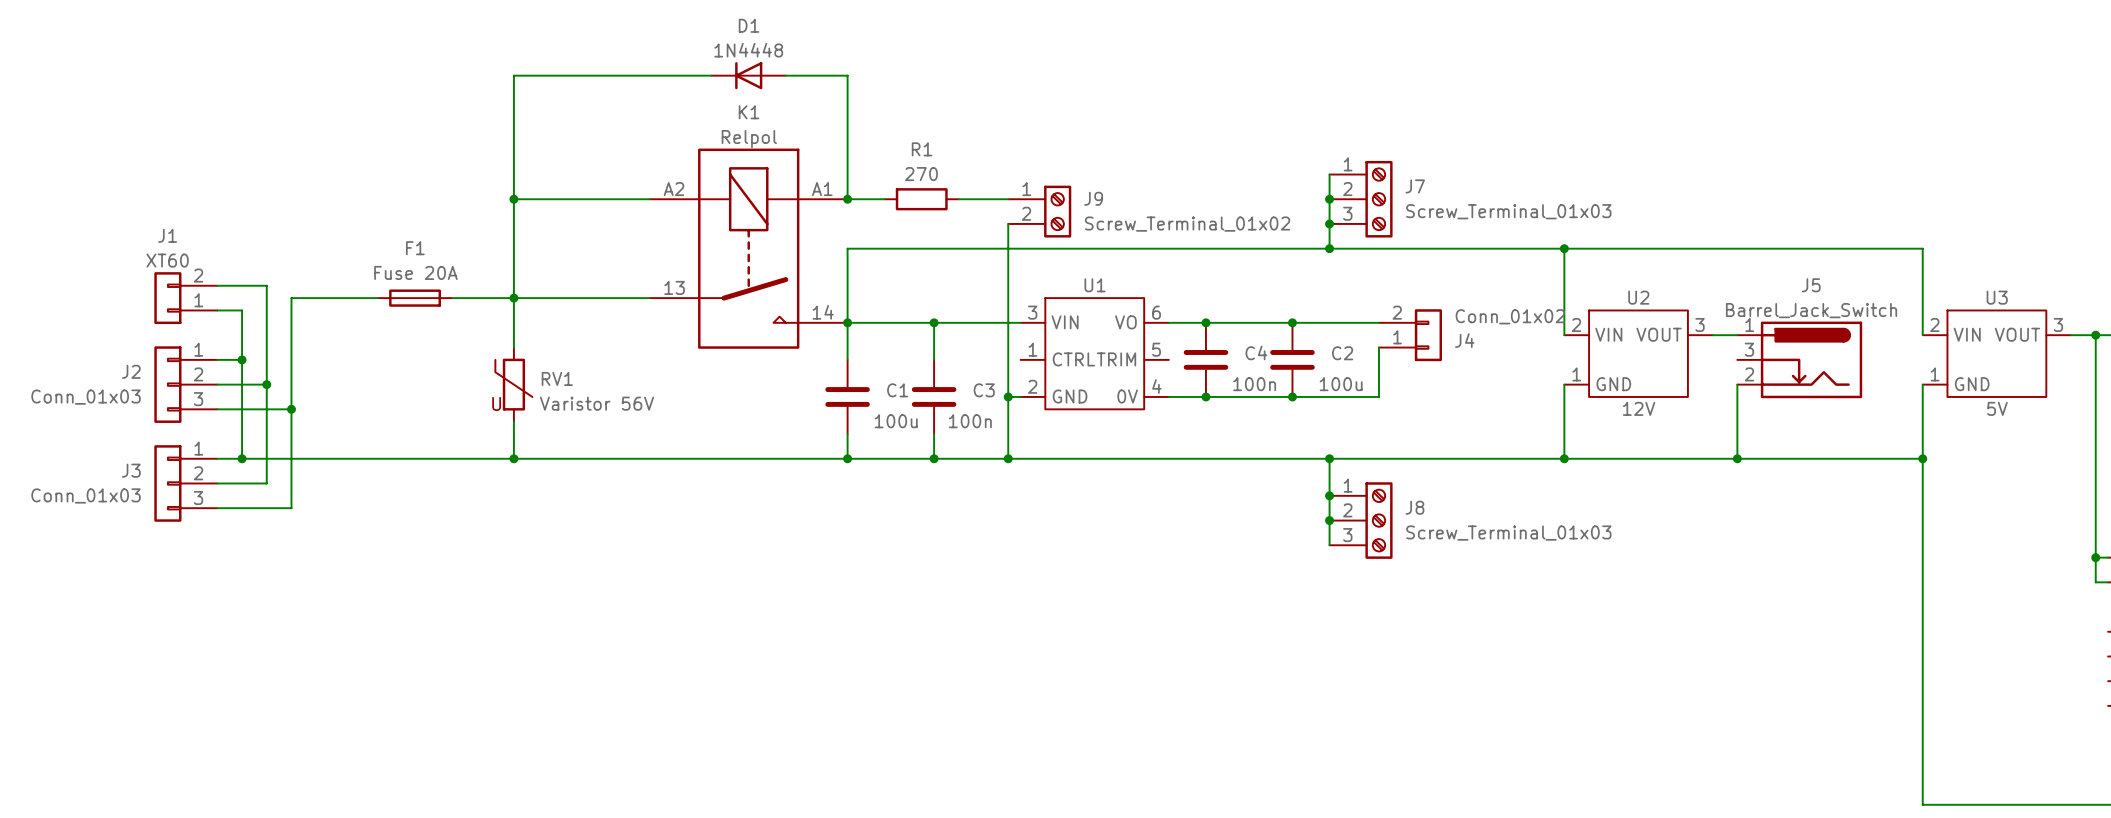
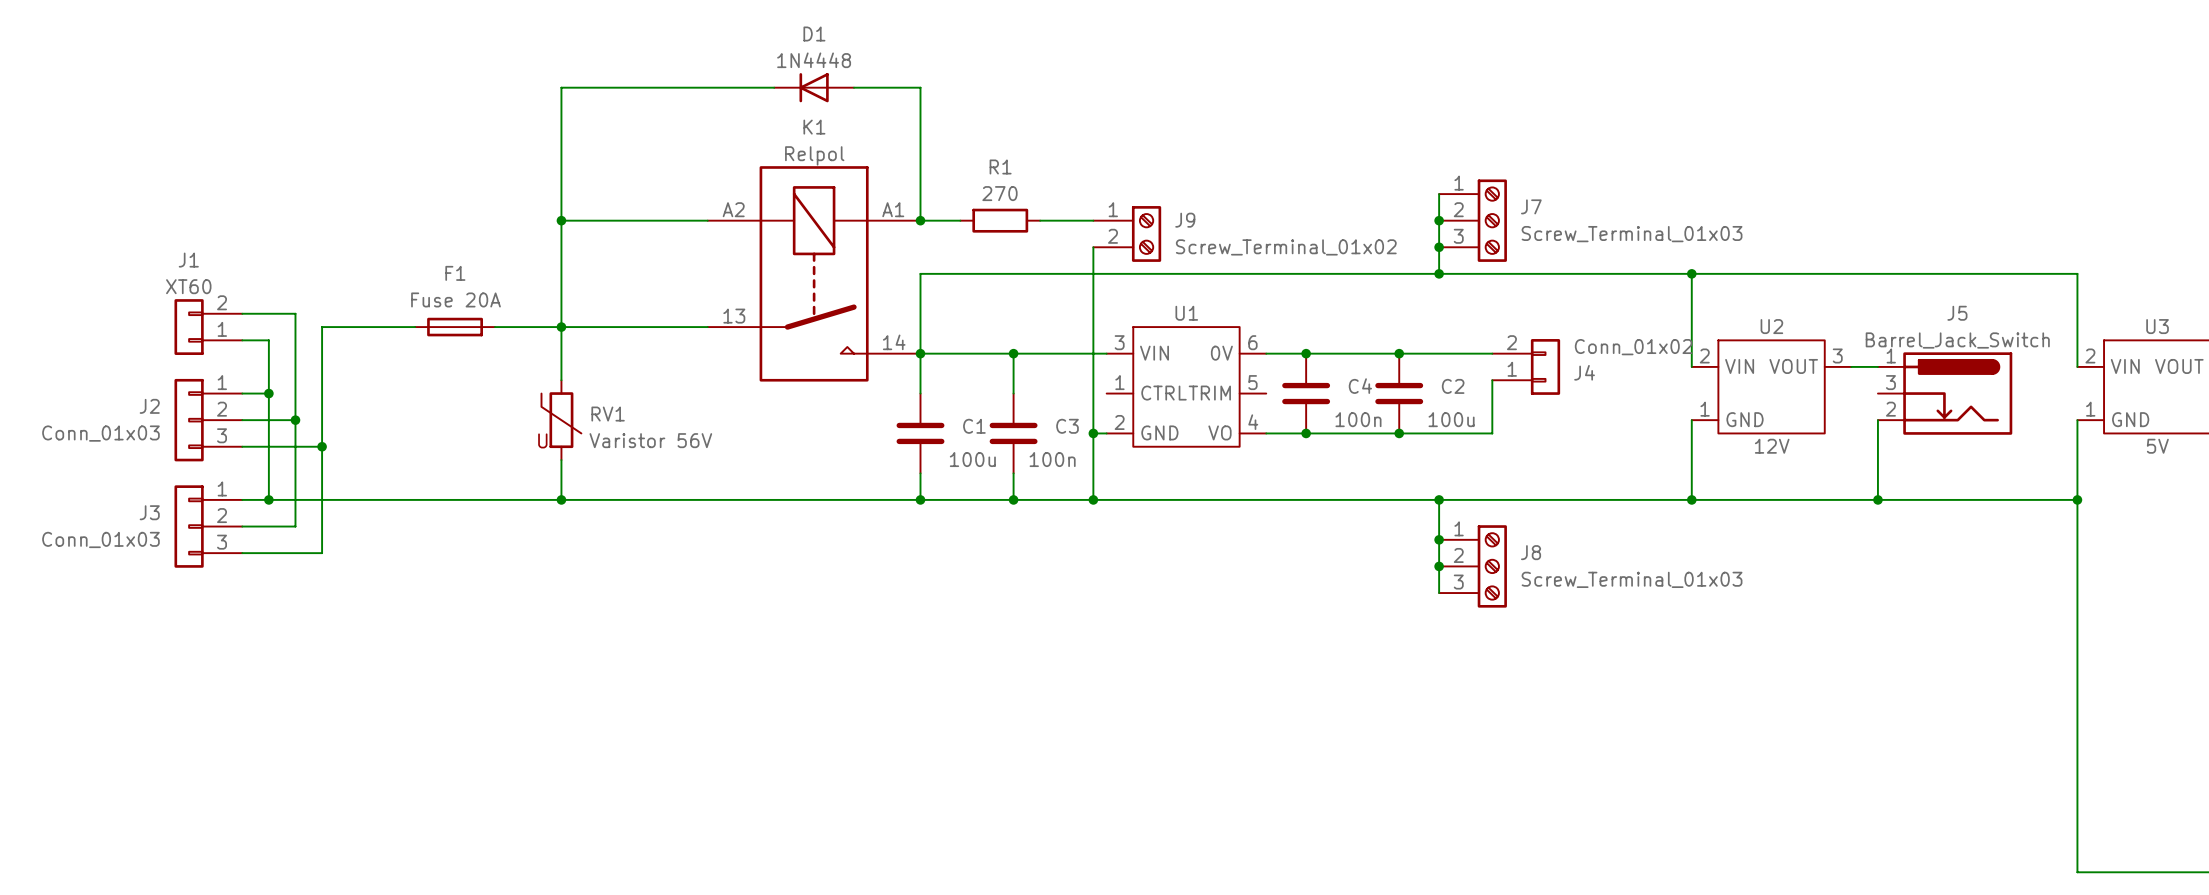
U1 pin name: VO (1125, 322) -> 0V (1221, 353)
U1 pin name: 0V (1127, 396) -> VO (1219, 432)

